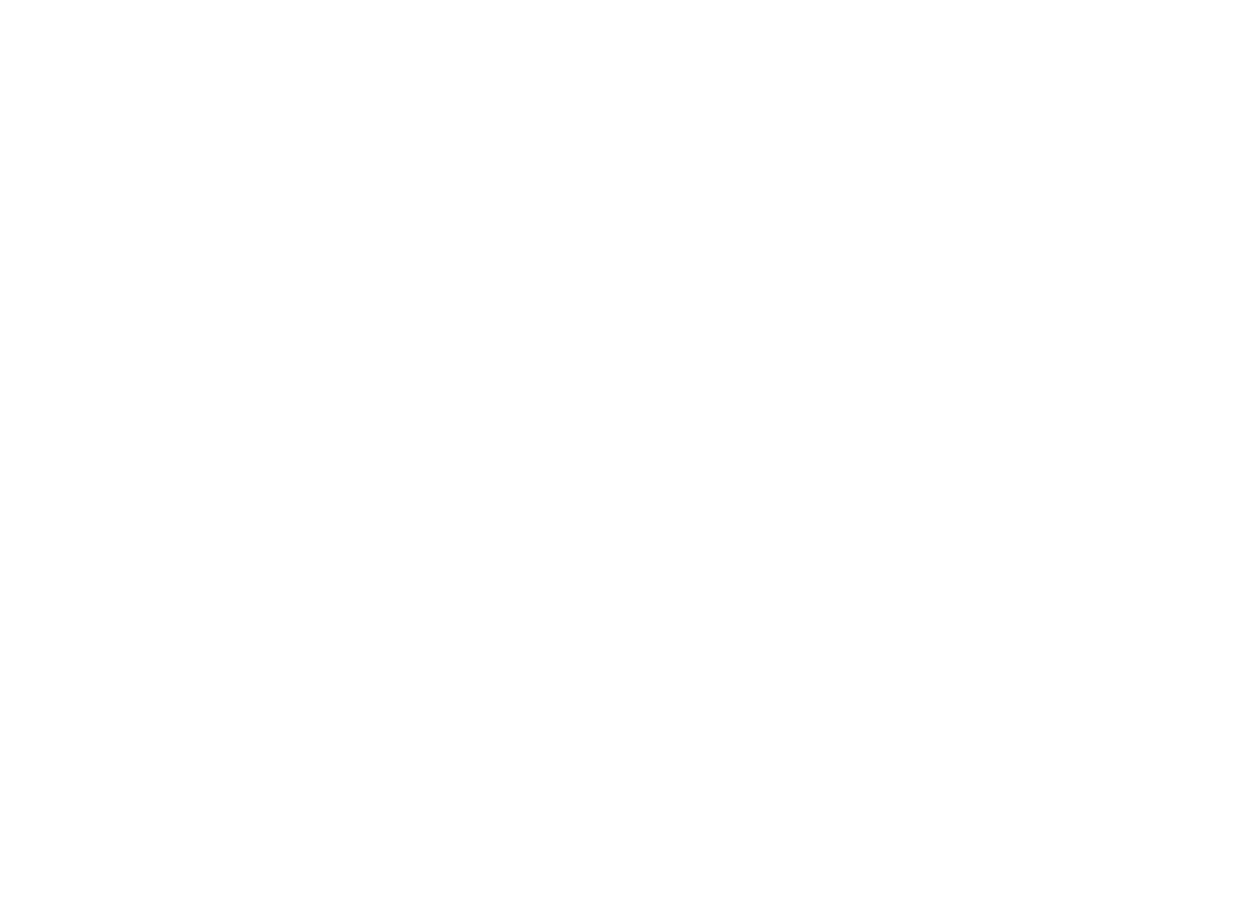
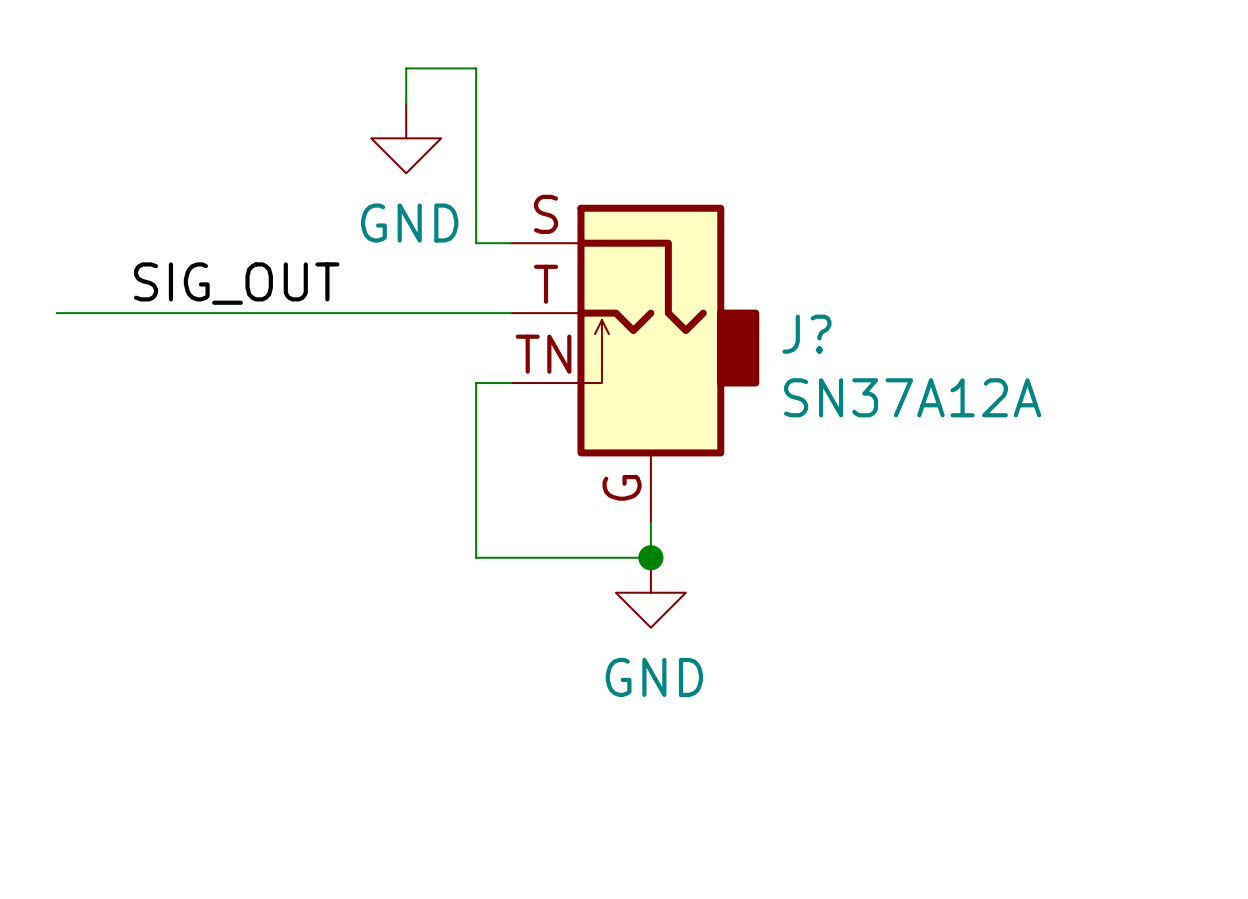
wire: none -> (406, 103) (406, 68) (476, 68) (476, 243) (511, 243)
power symbol: none -> GND (406, 138)
label: none -> SIG_OUT (236, 283)
wire: none -> (56, 313) (511, 313)
J?: none -> SN37A12A (635, 363)
wire: none -> (511, 383) (476, 383) (476, 557) (650, 557) (650, 522)
junction: none -> (650, 557)
power symbol: none -> GND (650, 592)

